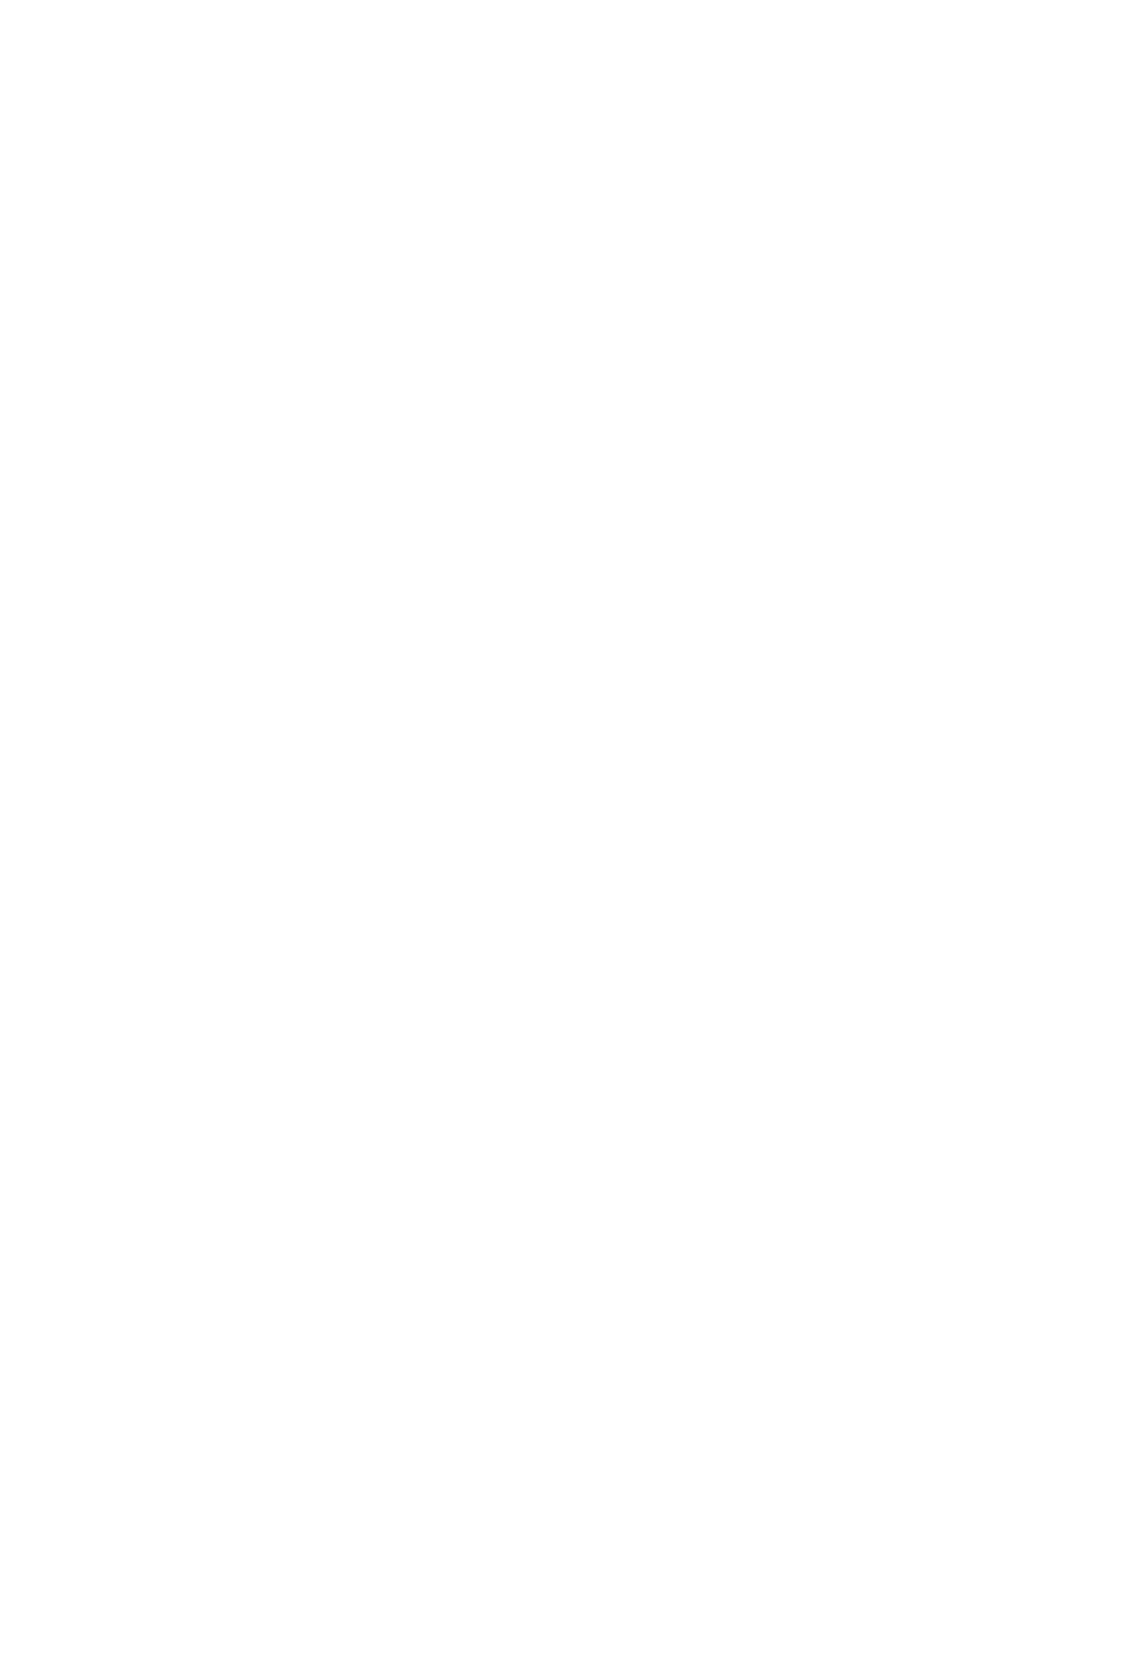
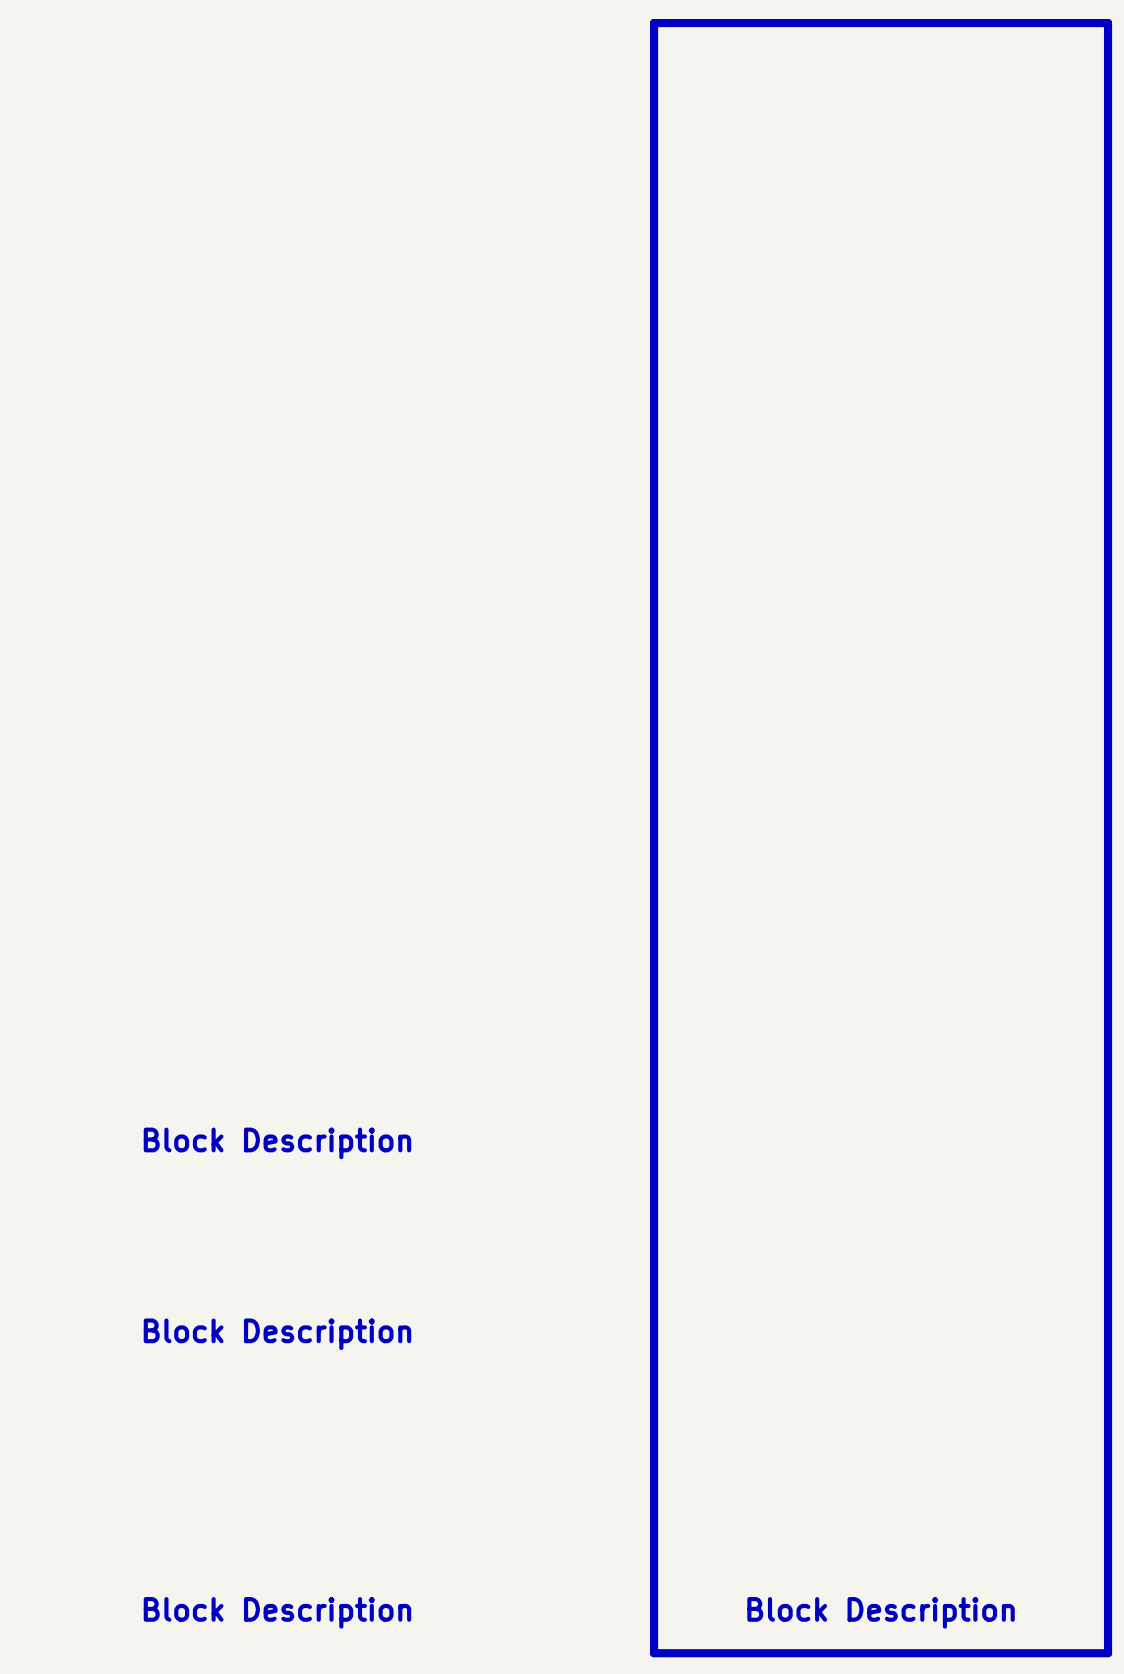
line: none -> (654, 23) (1108, 23) (1108, 1653) (654, 1653) (654, 23)
text: none -> Block Description (277, 1143)
text: none -> Block Description (277, 1334)
text: none -> Block Description (277, 1612)
text: none -> Block Description (881, 1612)

